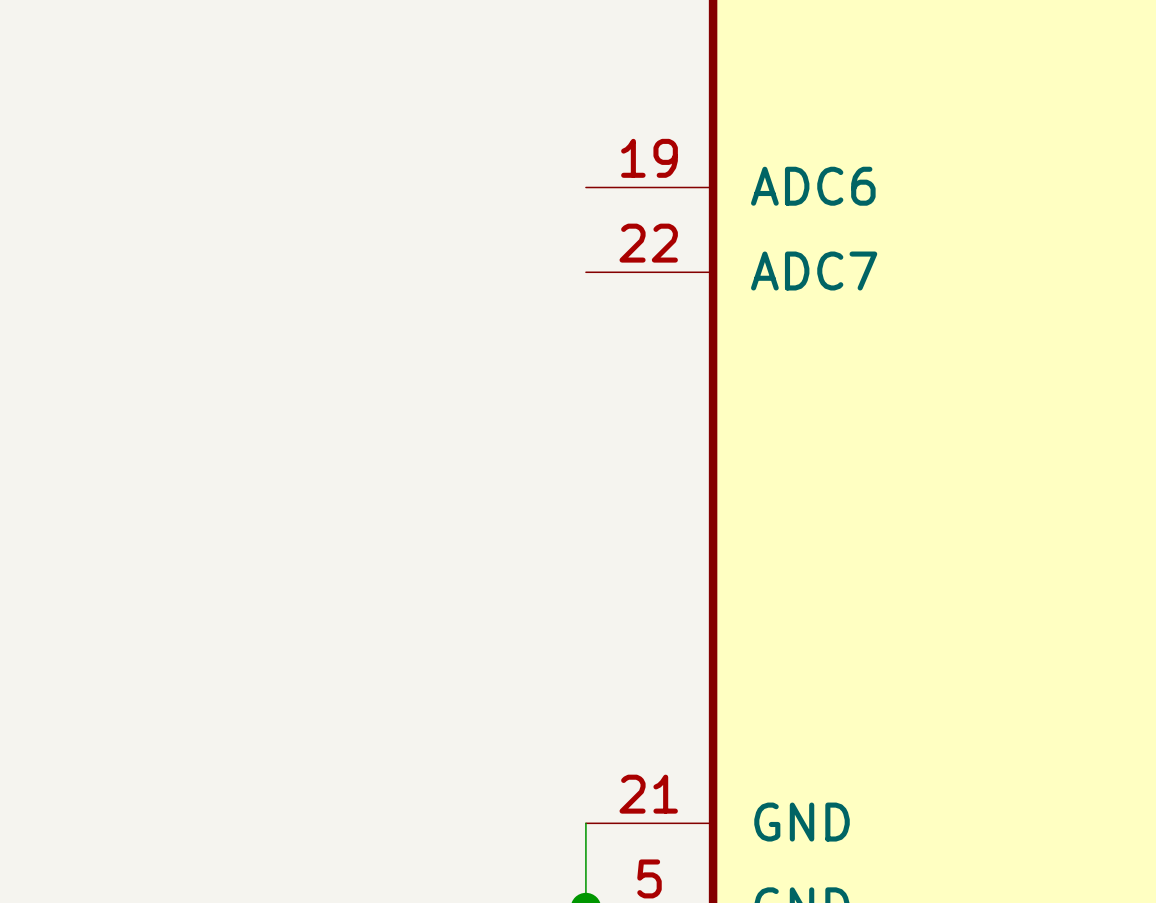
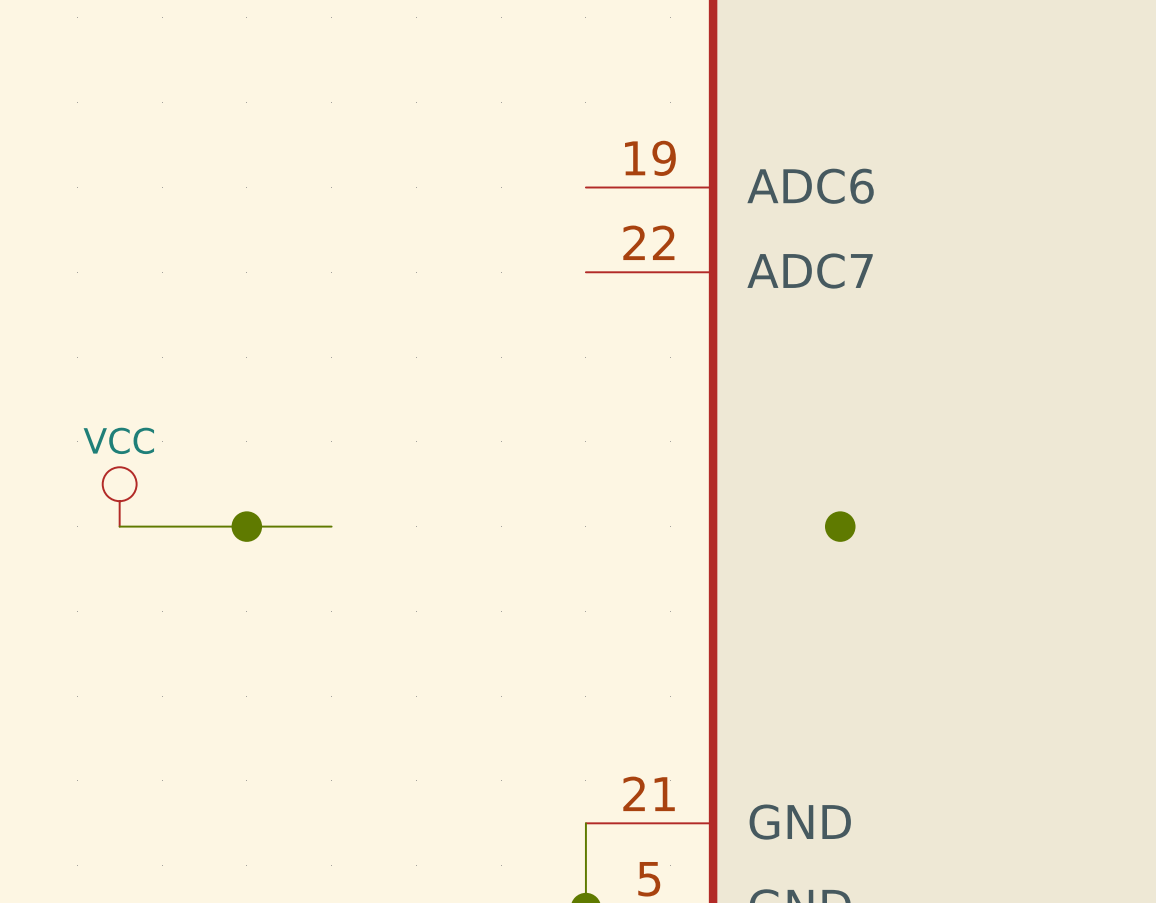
power symbol: none -> VCC (119, 496)
wire: none -> (119, 526) (331, 526)
junction: none -> (246, 526)
junction: none -> (840, 526)

